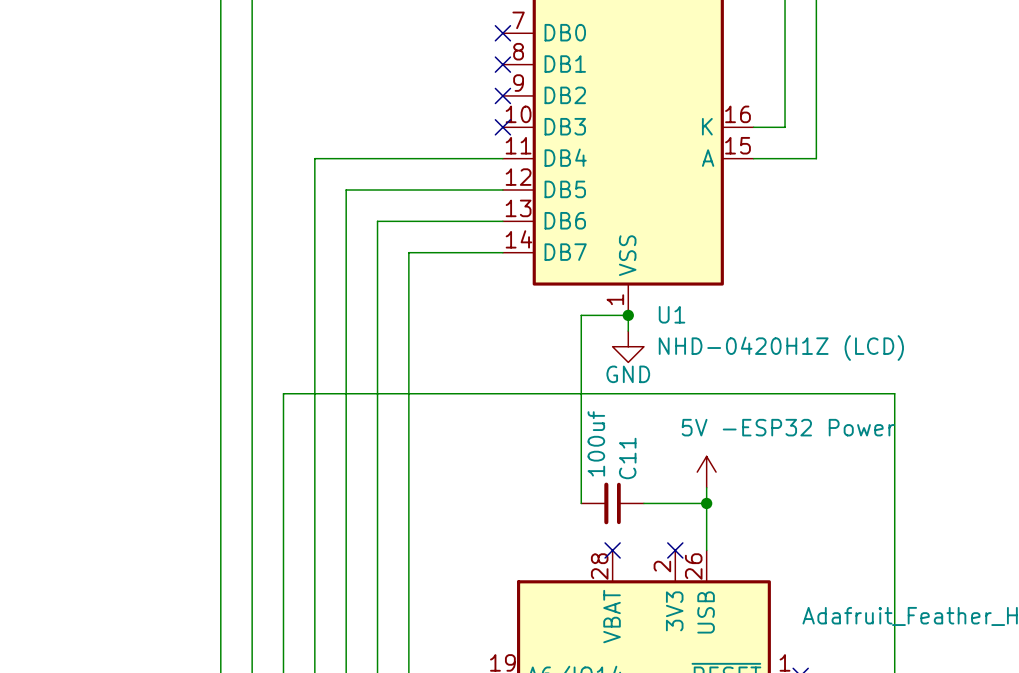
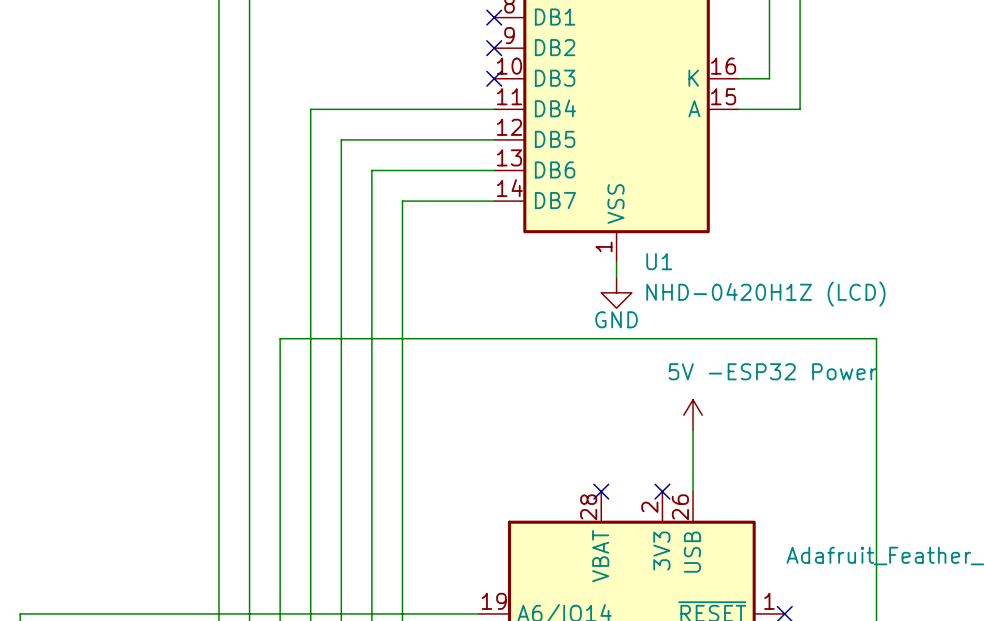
wire: (628, 315) (581, 315) (581, 503) -> none
junction: (628, 315) -> none
C11: 100uf (612, 503) -> none
wire: (643, 503) (706, 503) -> none
junction: (706, 503) -> none

